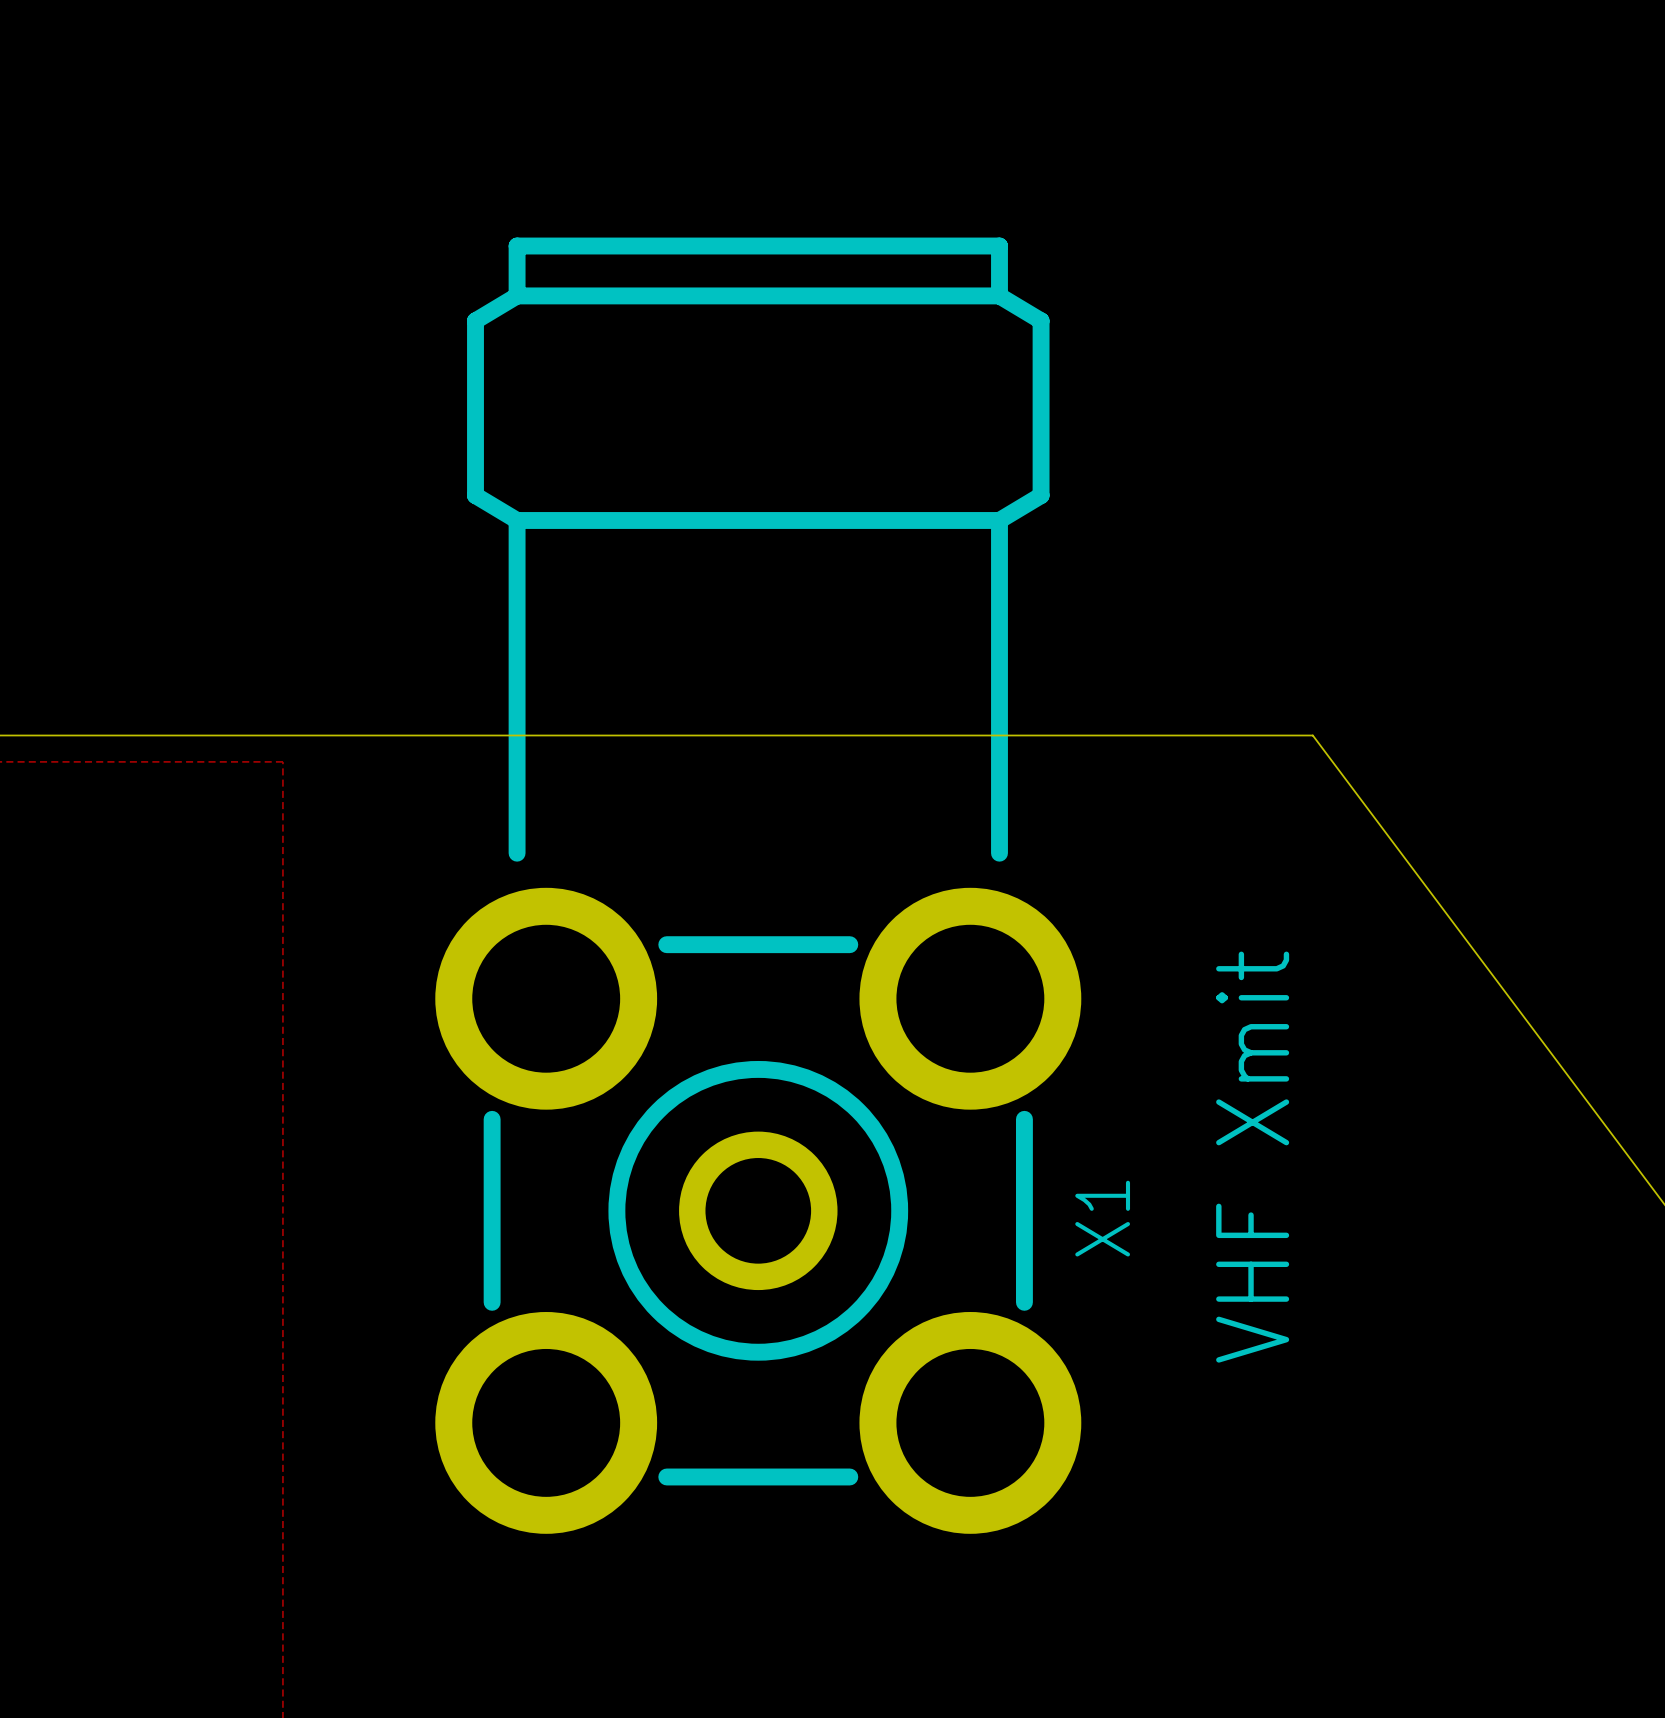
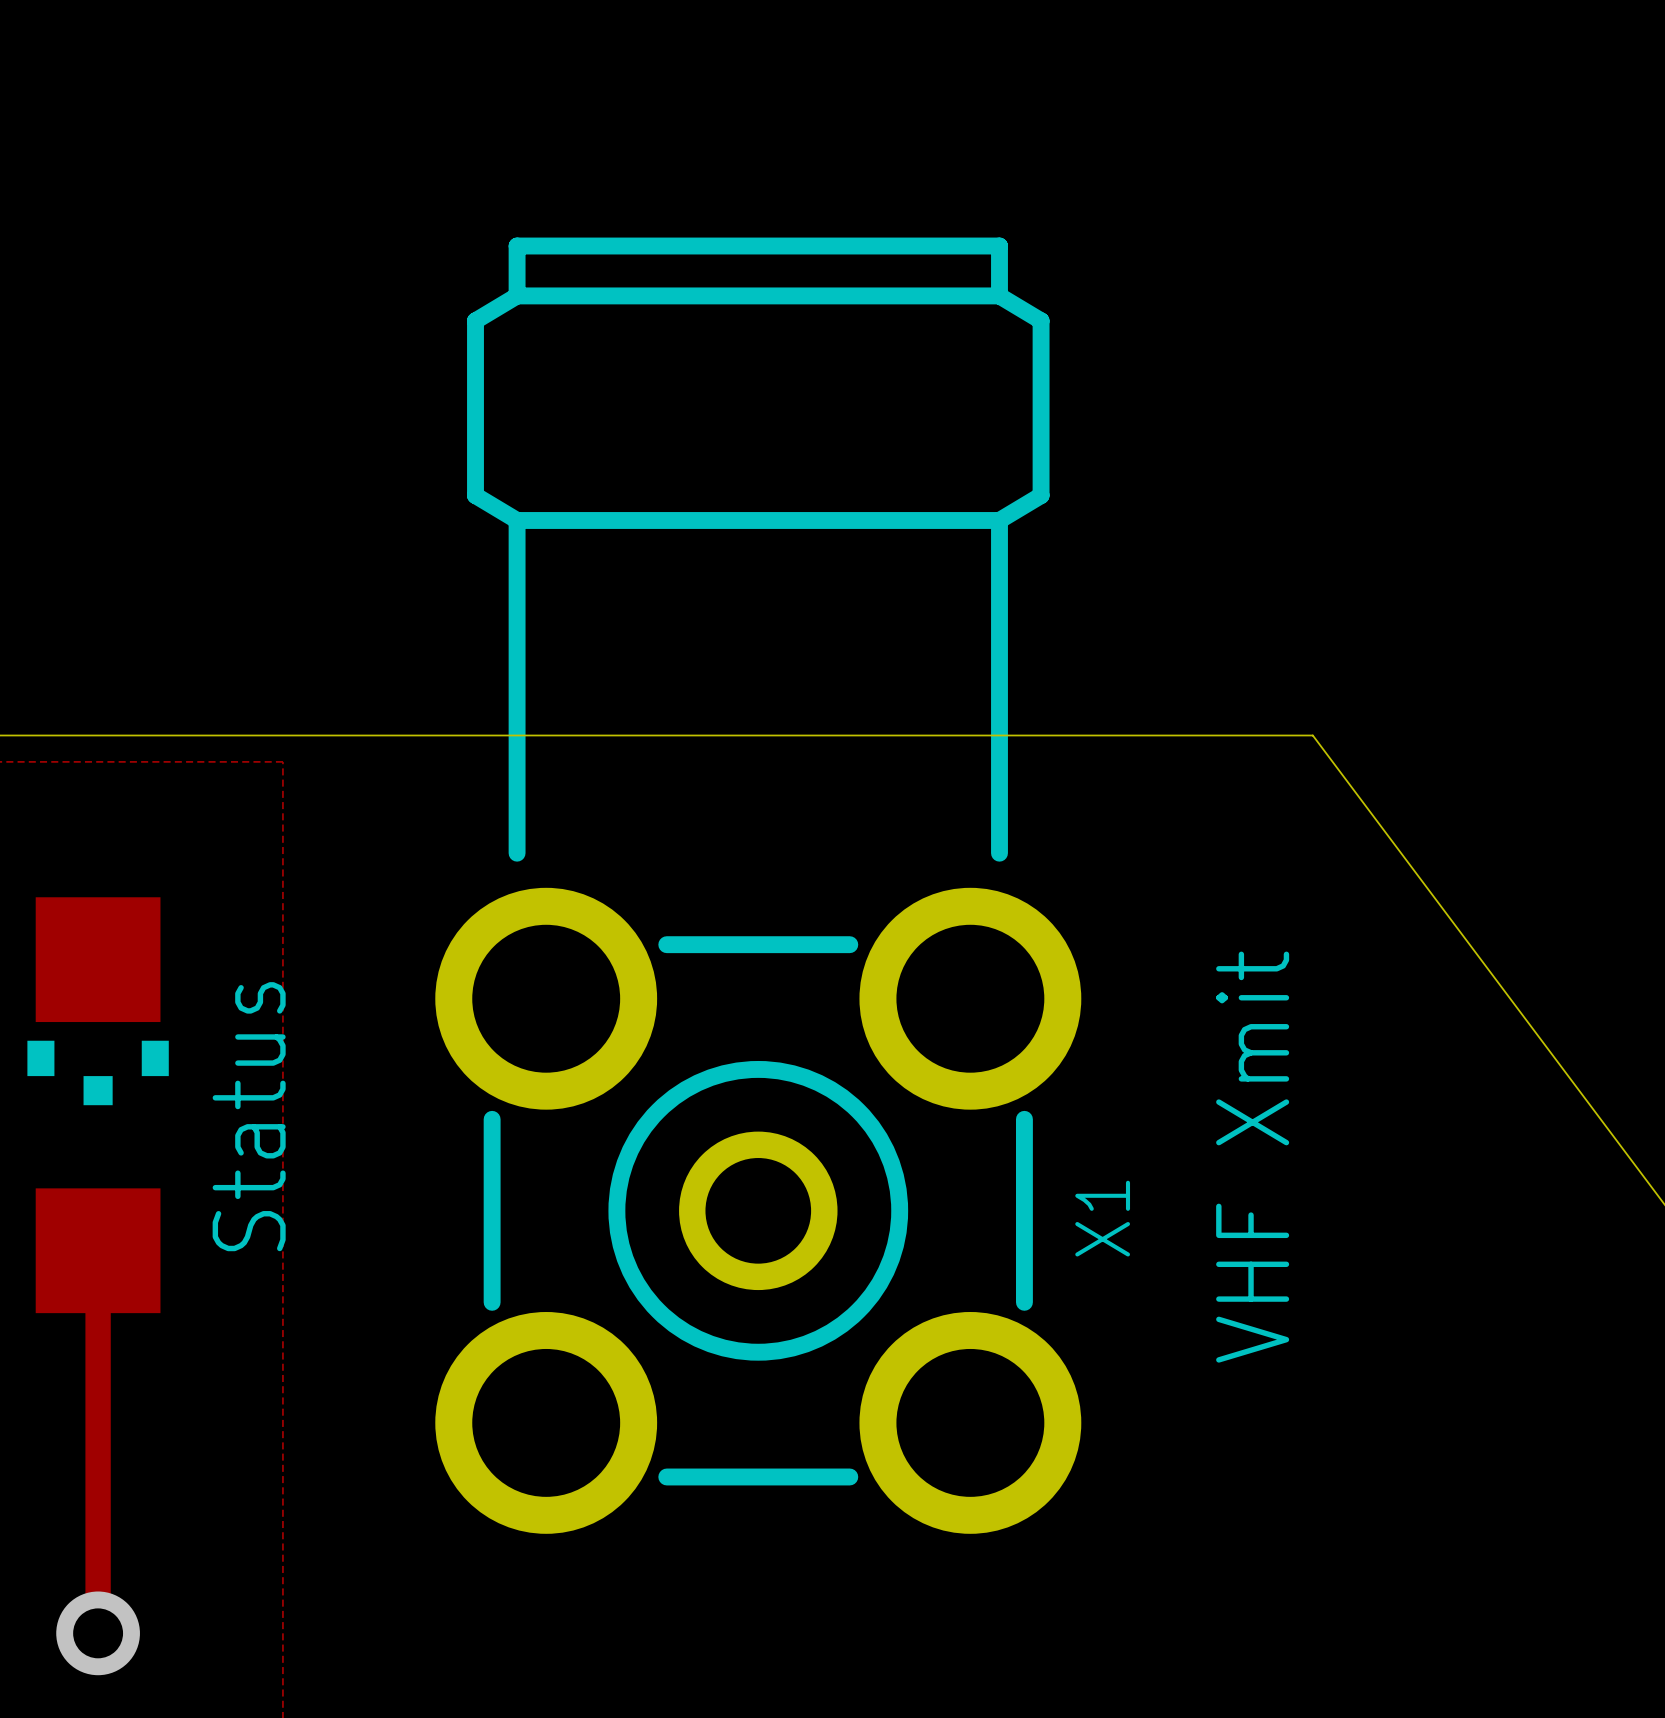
part: none -> (98, 1105)
text: none -> Status (249, 1116)
track: none -> (98, 1250) (98, 1633)
via: none -> (98, 1633)

